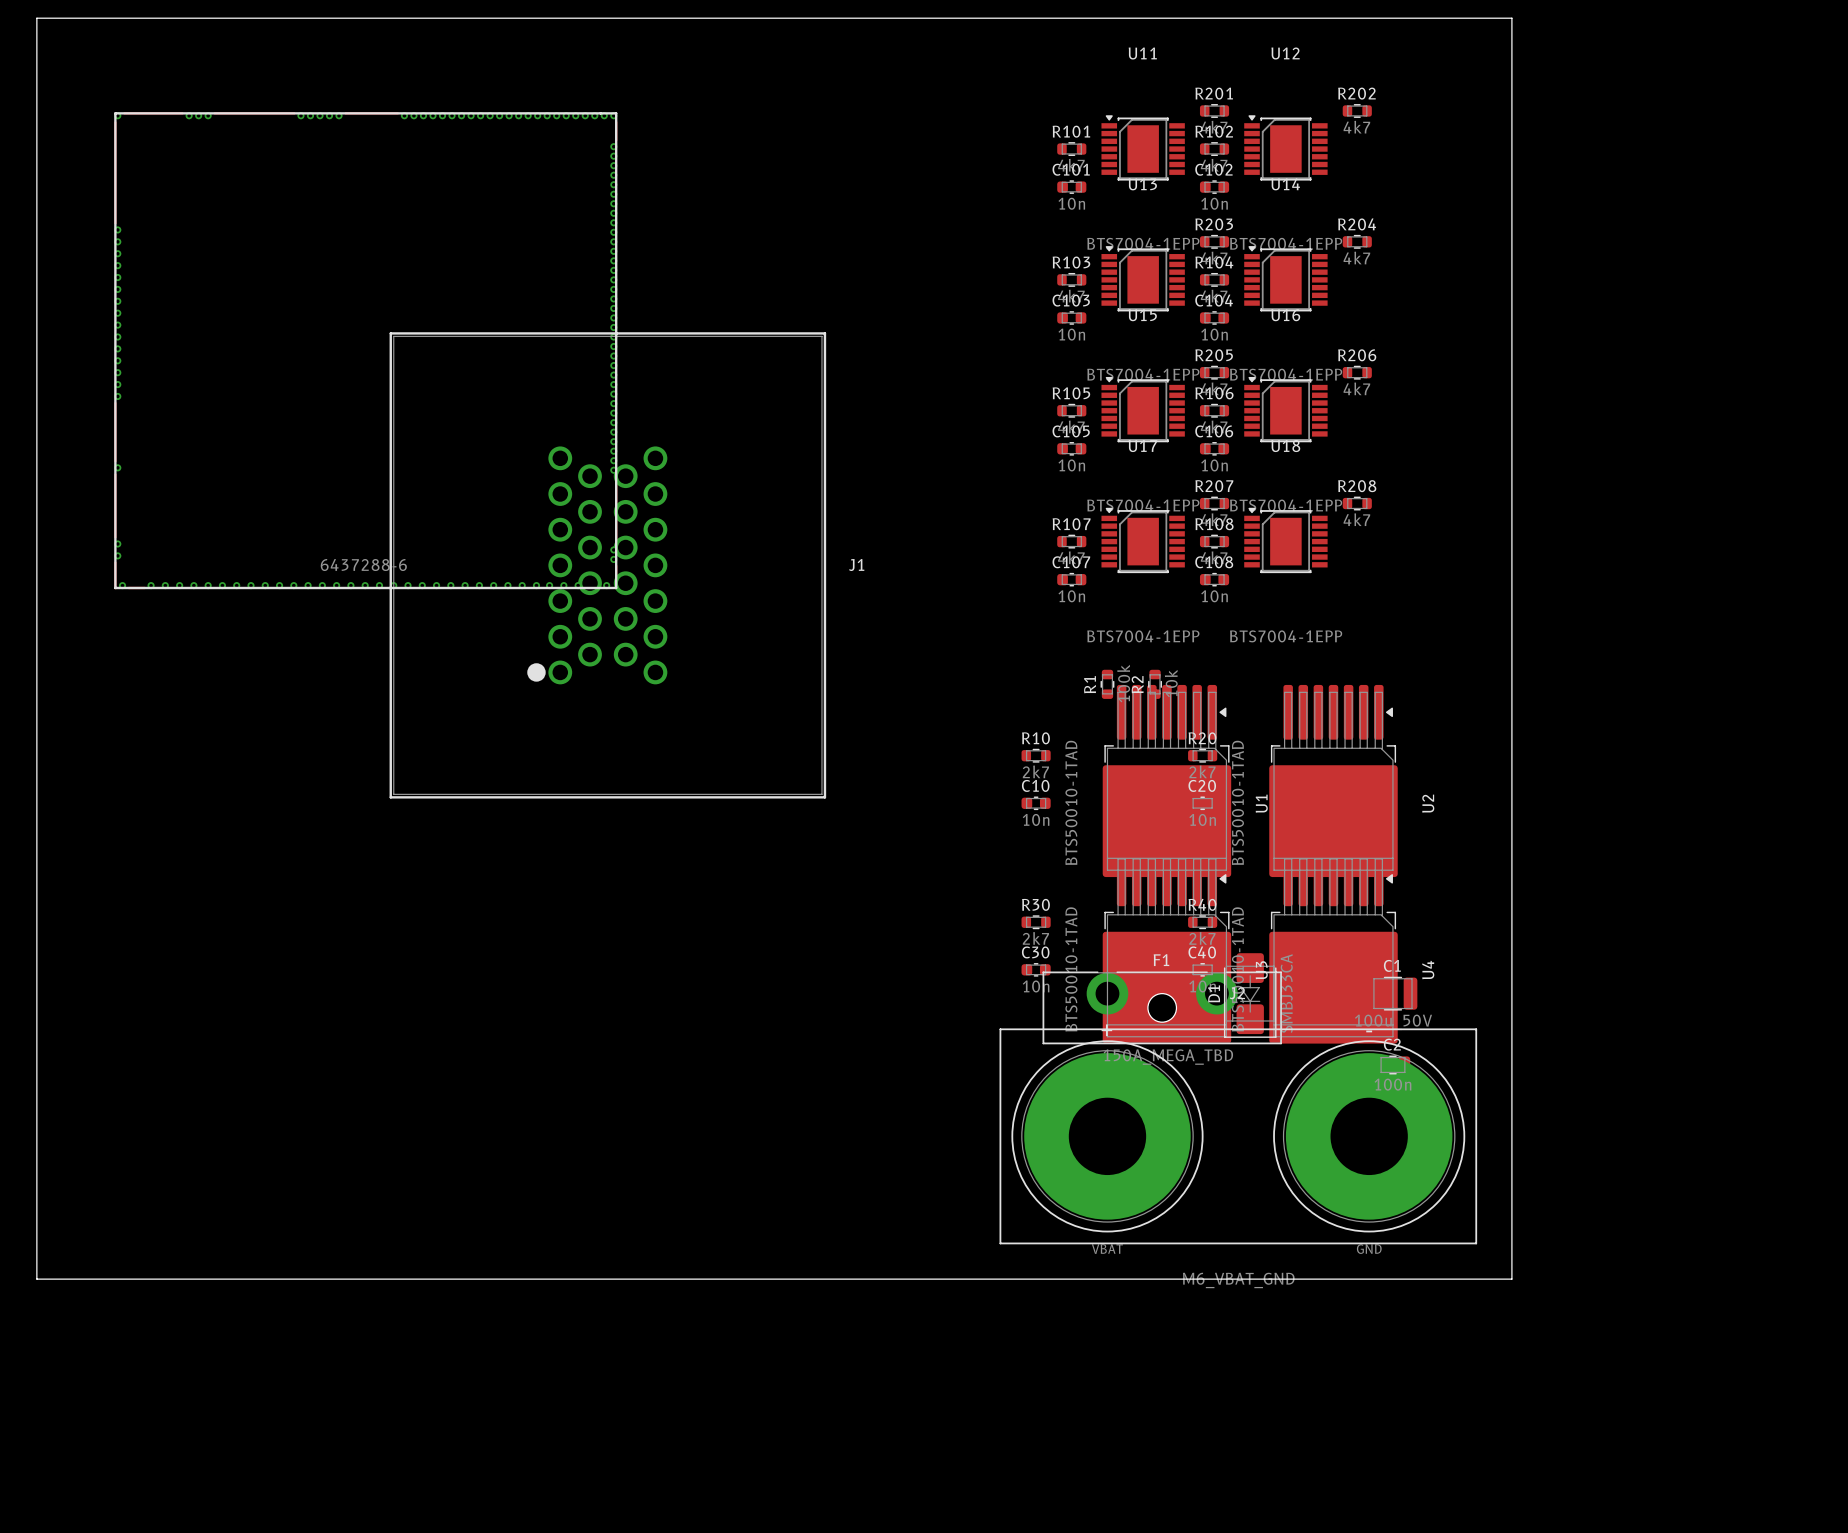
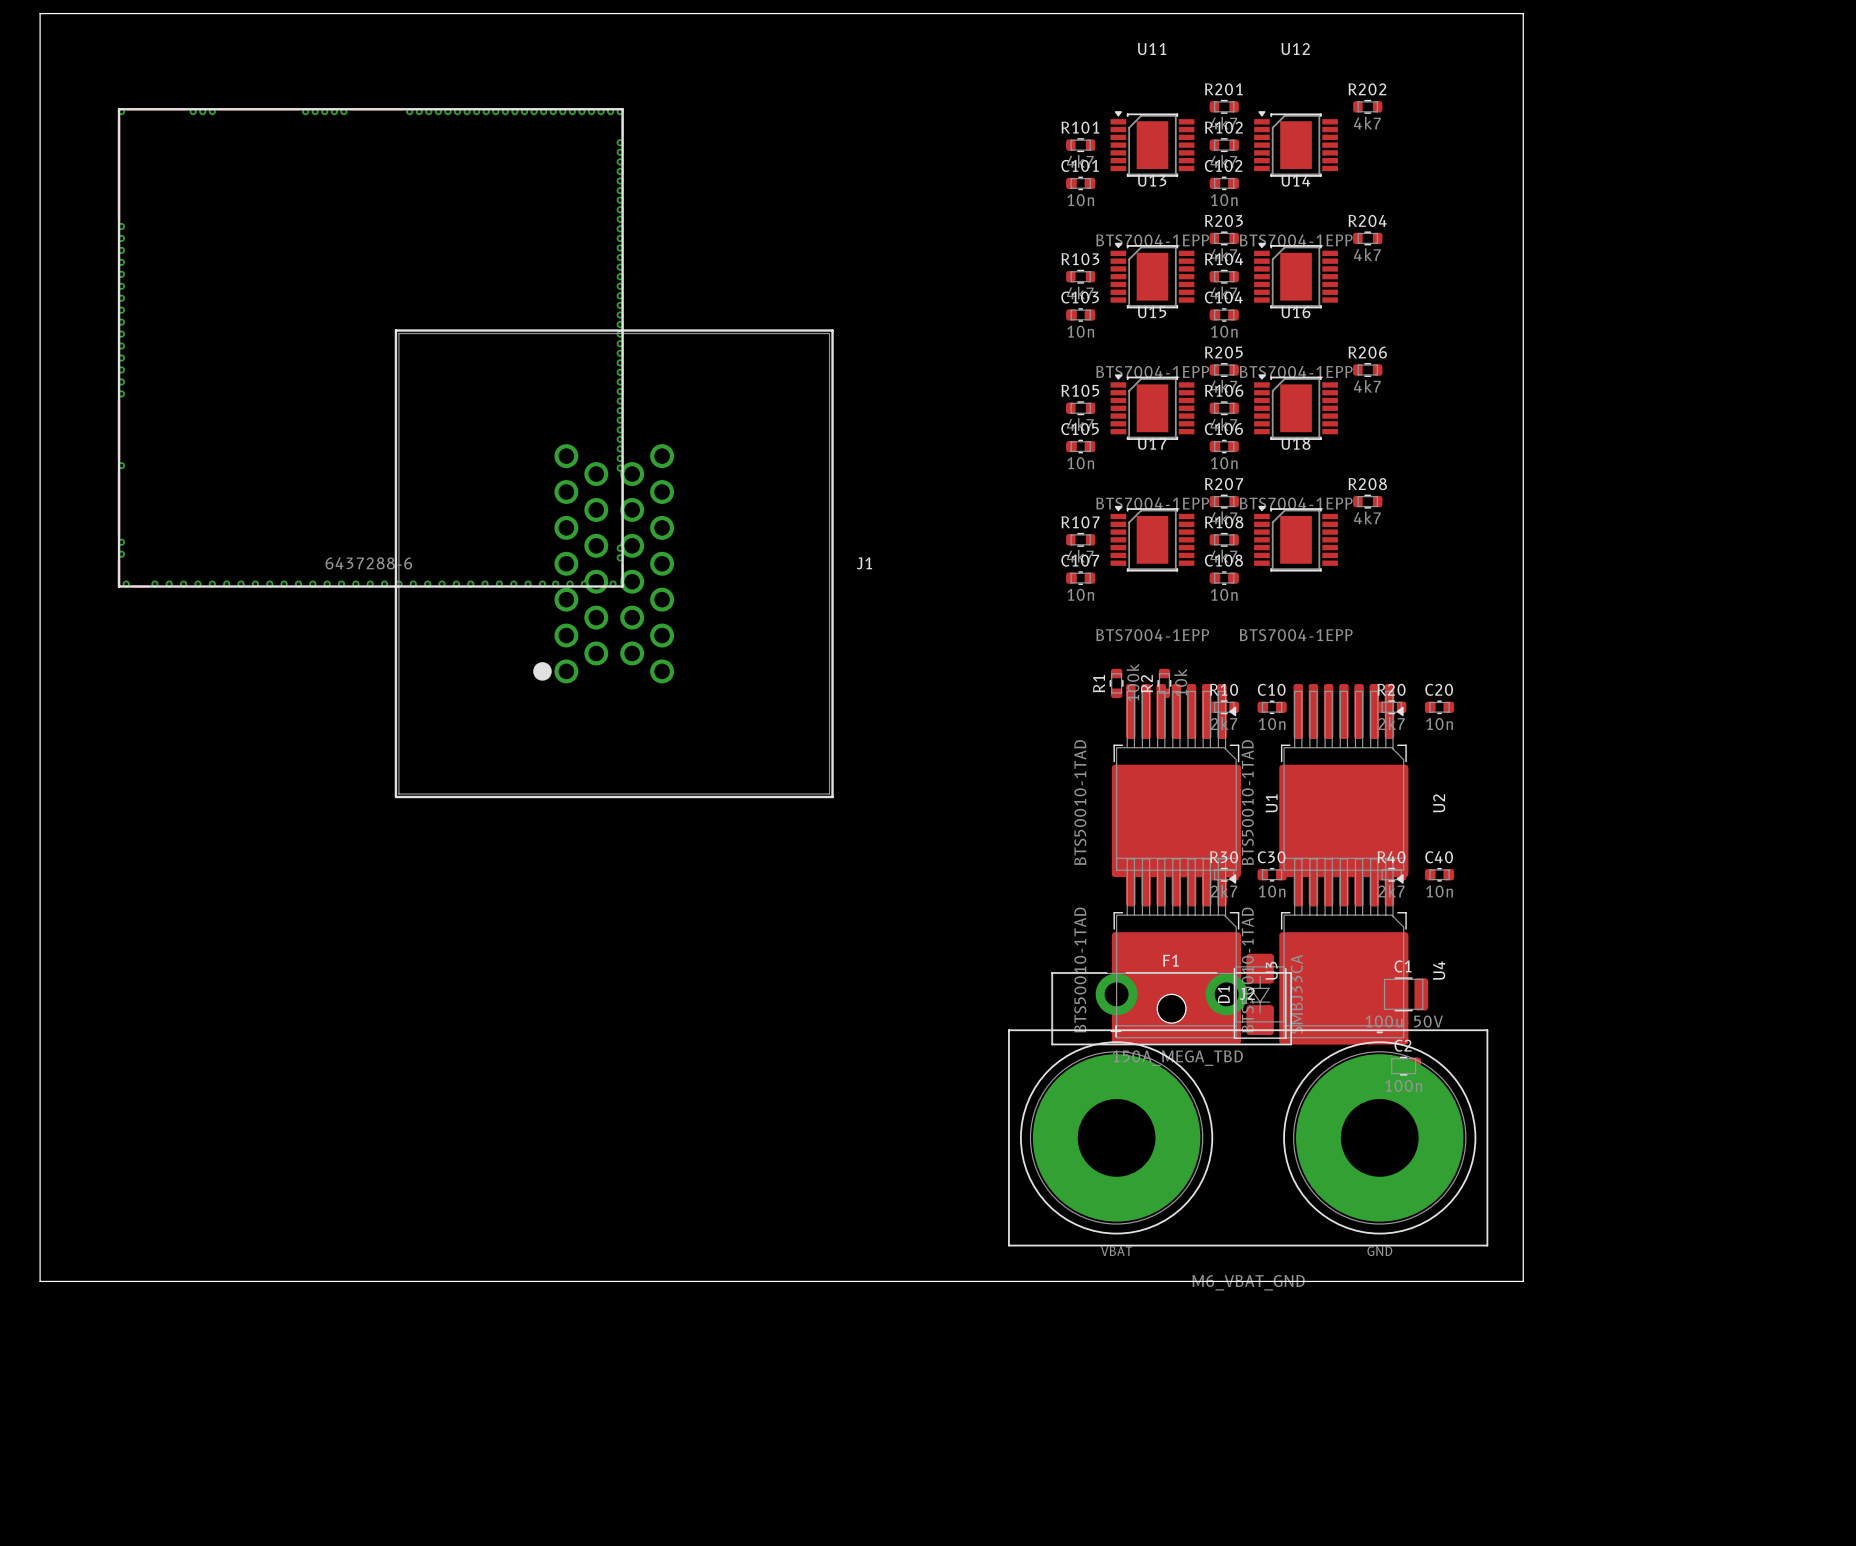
R10 position: (1036, 755) -> (1224, 707)
R20 position: (1202, 755) -> (1391, 707)
C10 position: (1036, 803) -> (1272, 707)
C20 position: (1202, 803) -> (1439, 707)
R30 position: (1036, 922) -> (1224, 874)
R40 position: (1202, 922) -> (1391, 874)
C30 position: (1036, 969) -> (1272, 874)
C40 position: (1202, 969) -> (1439, 874)

